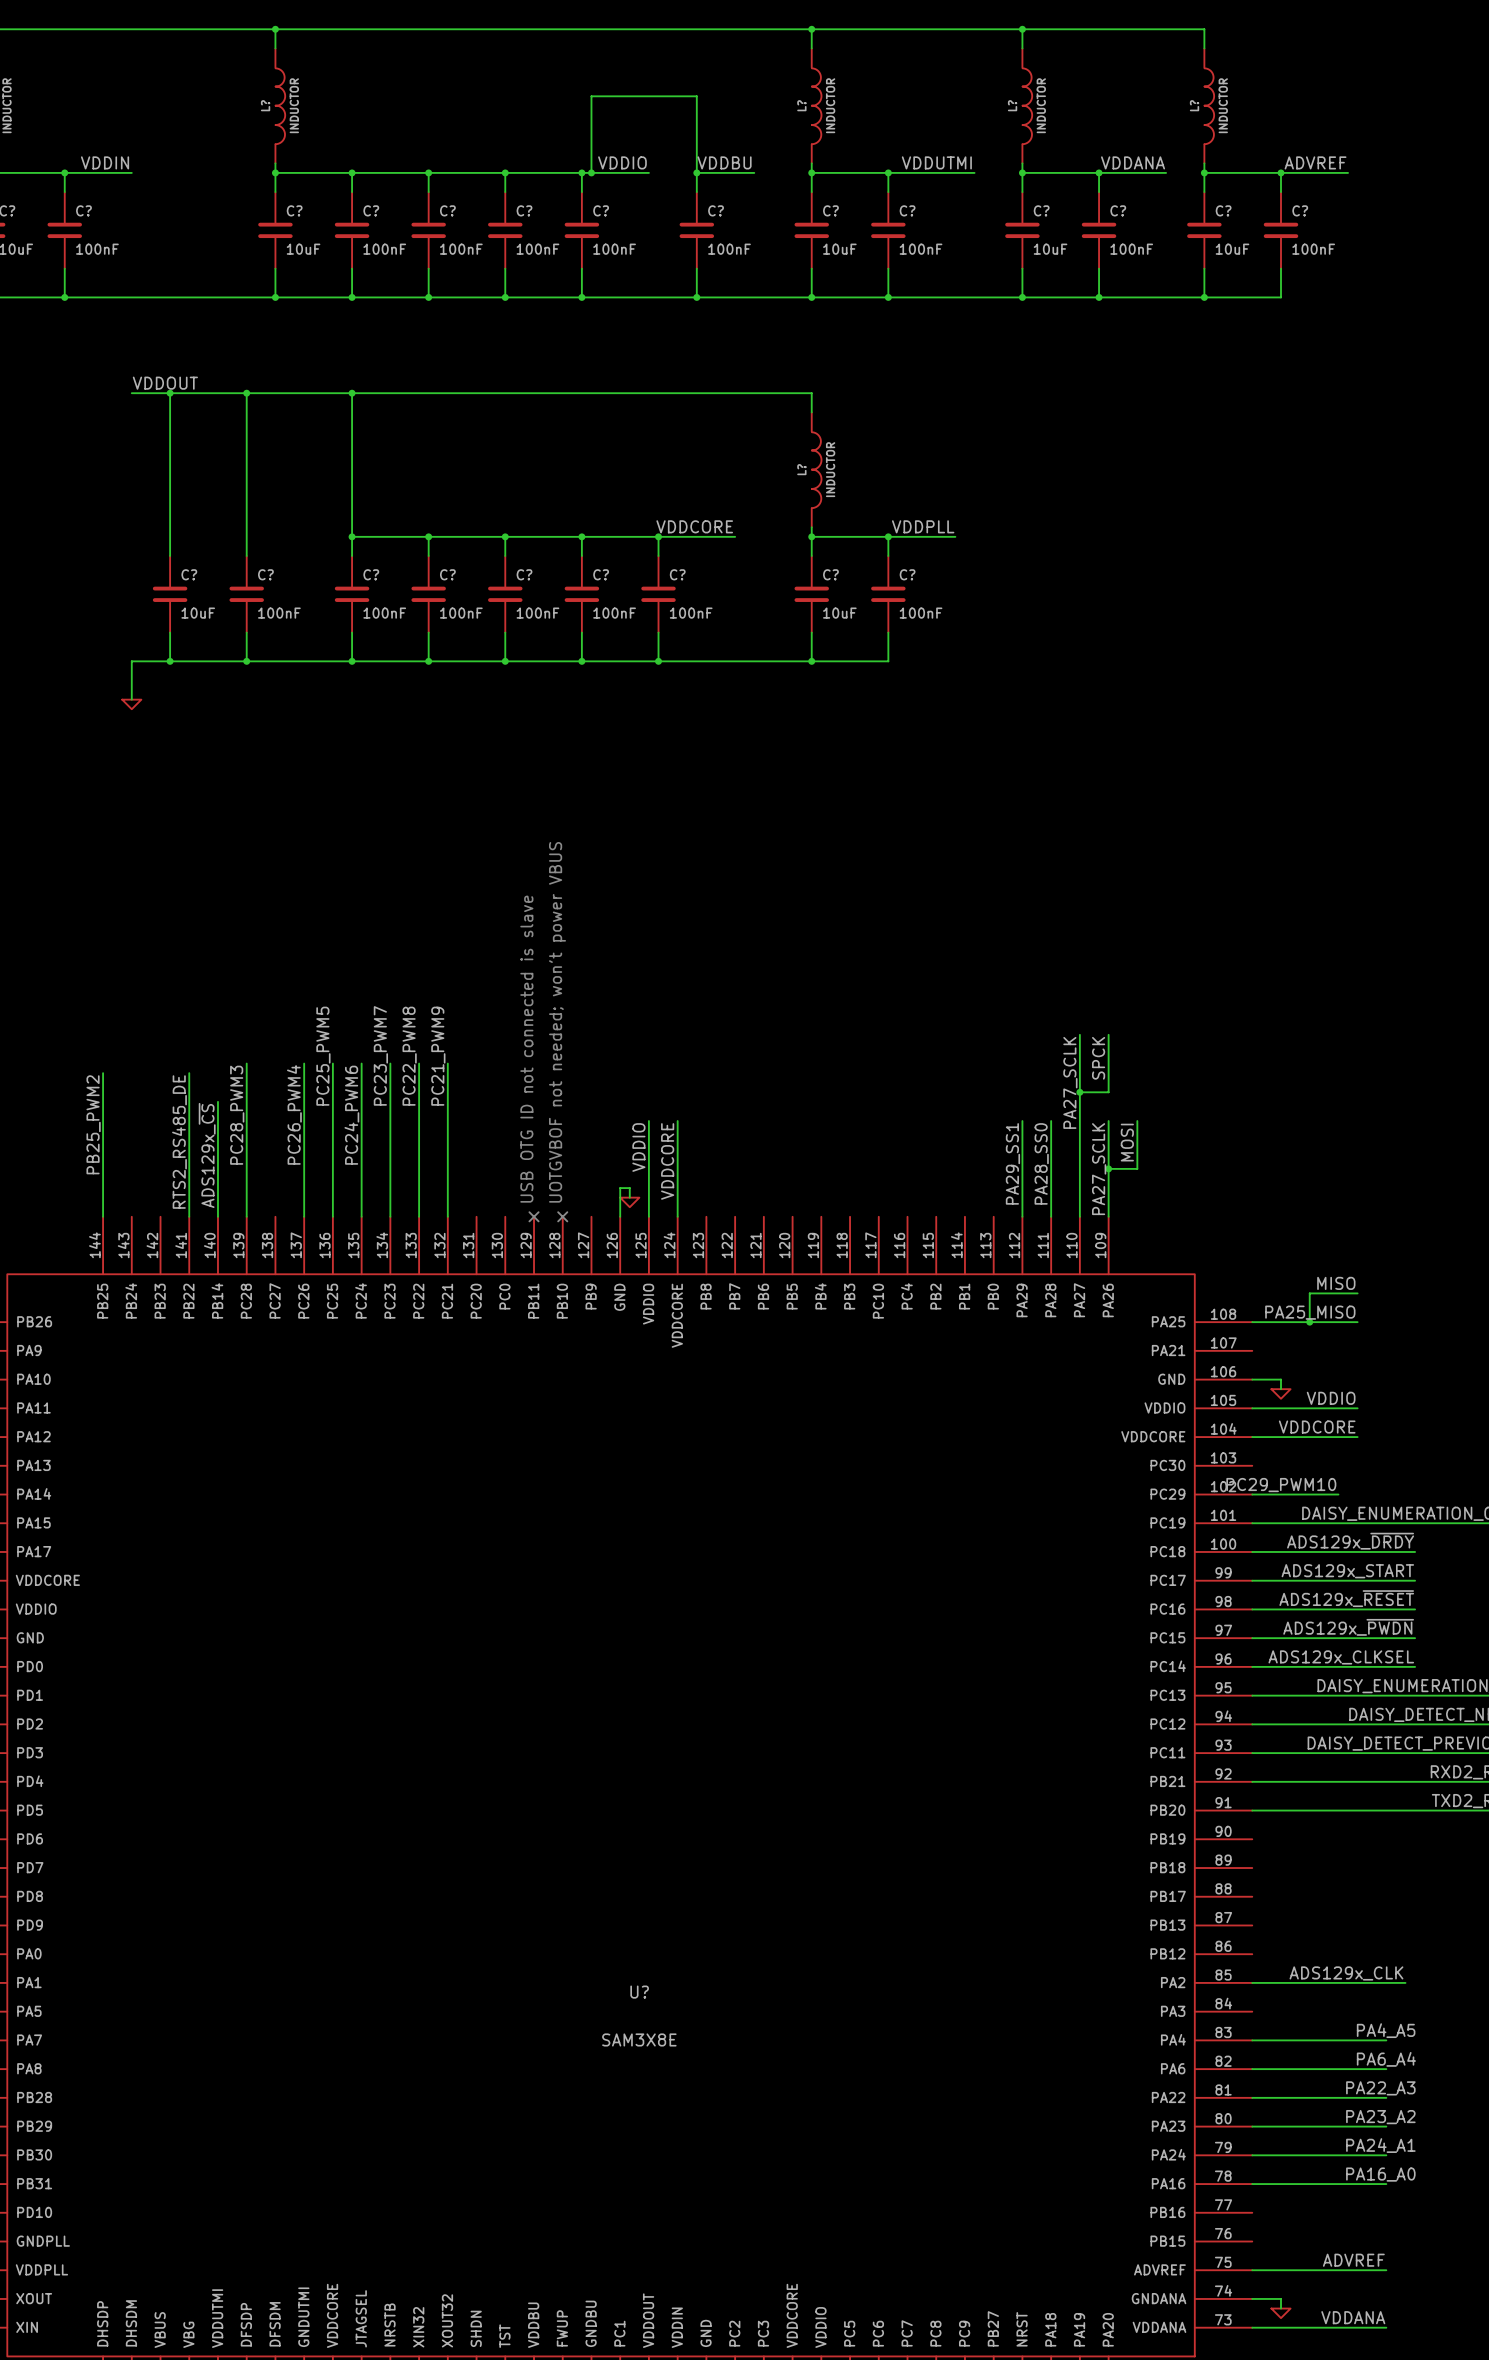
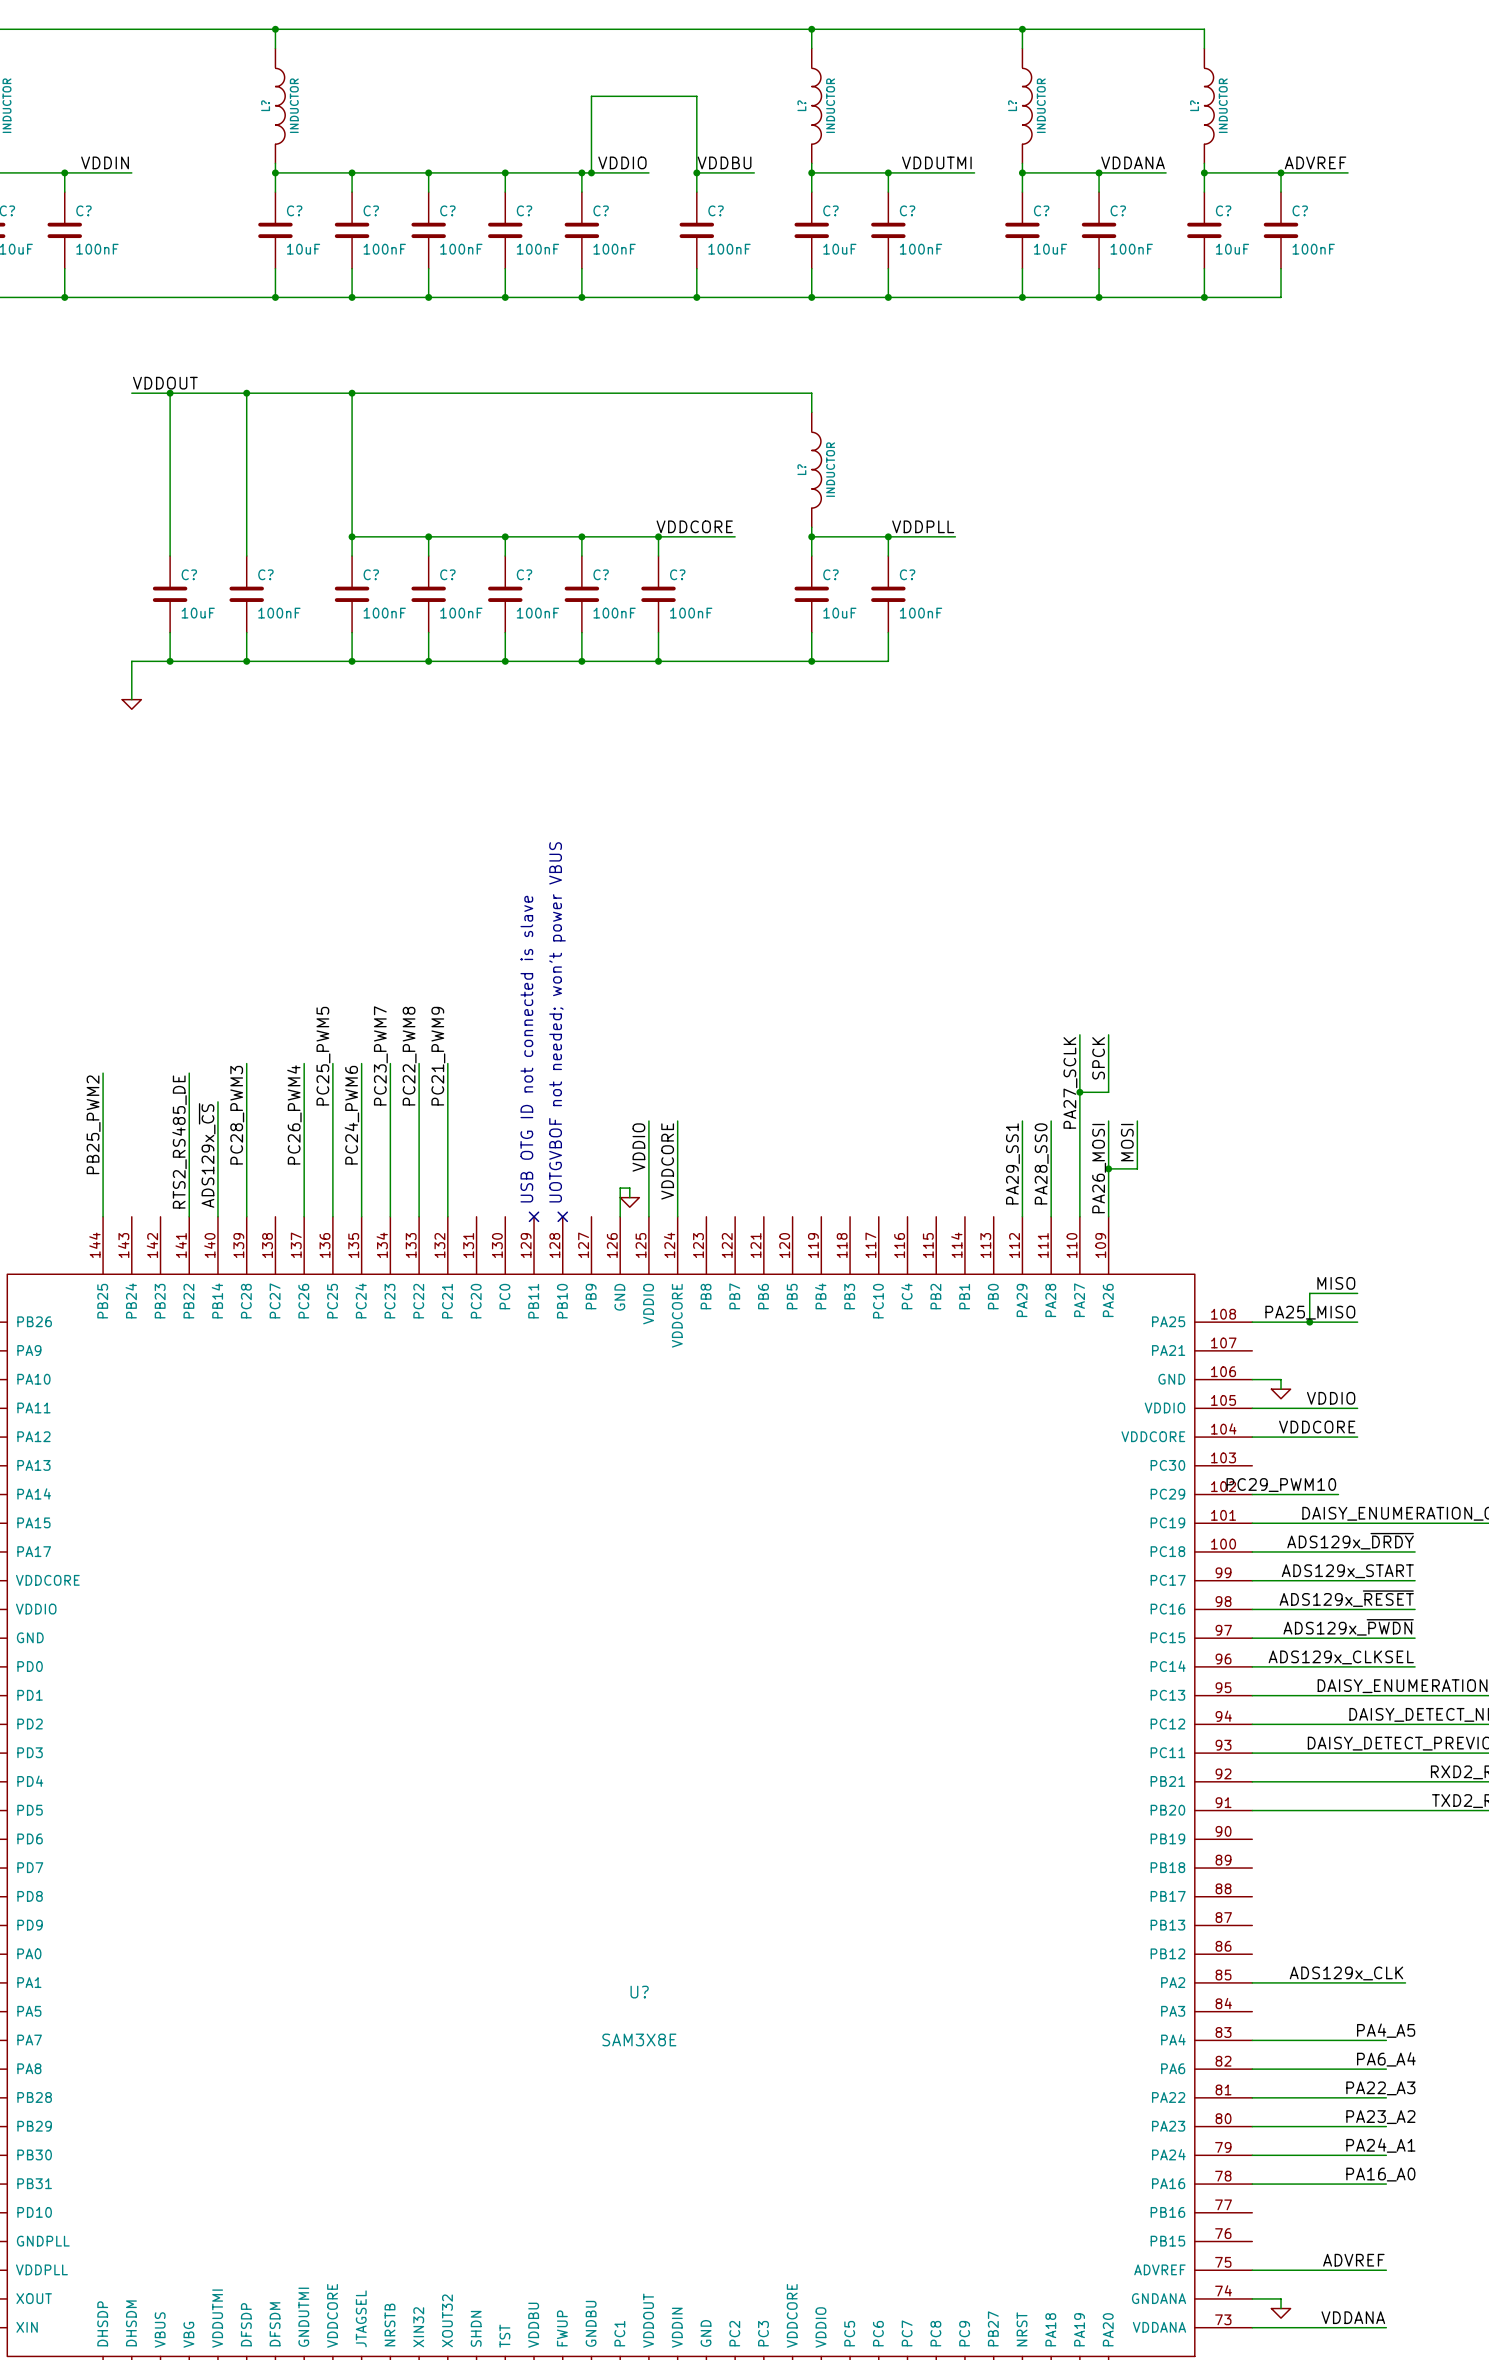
label: PA27_SCLK (1099, 1169) -> PA26_MOSI (1099, 1168)

